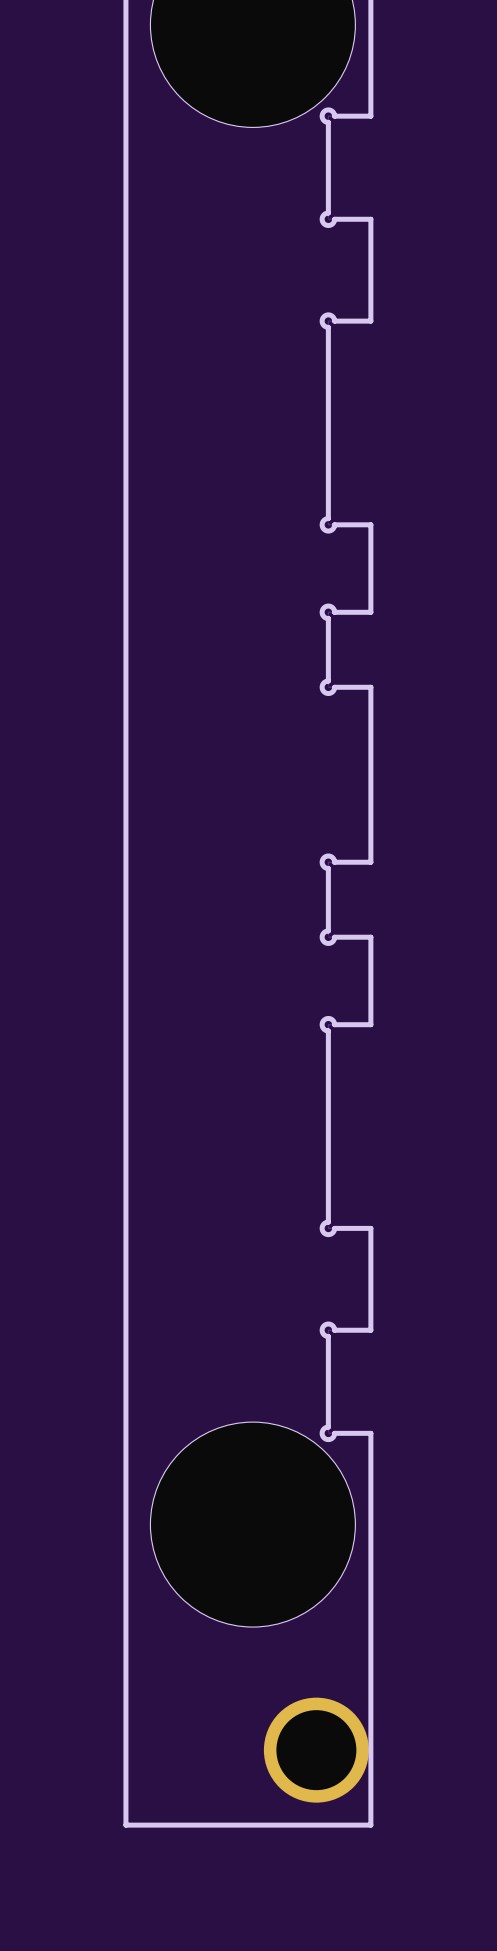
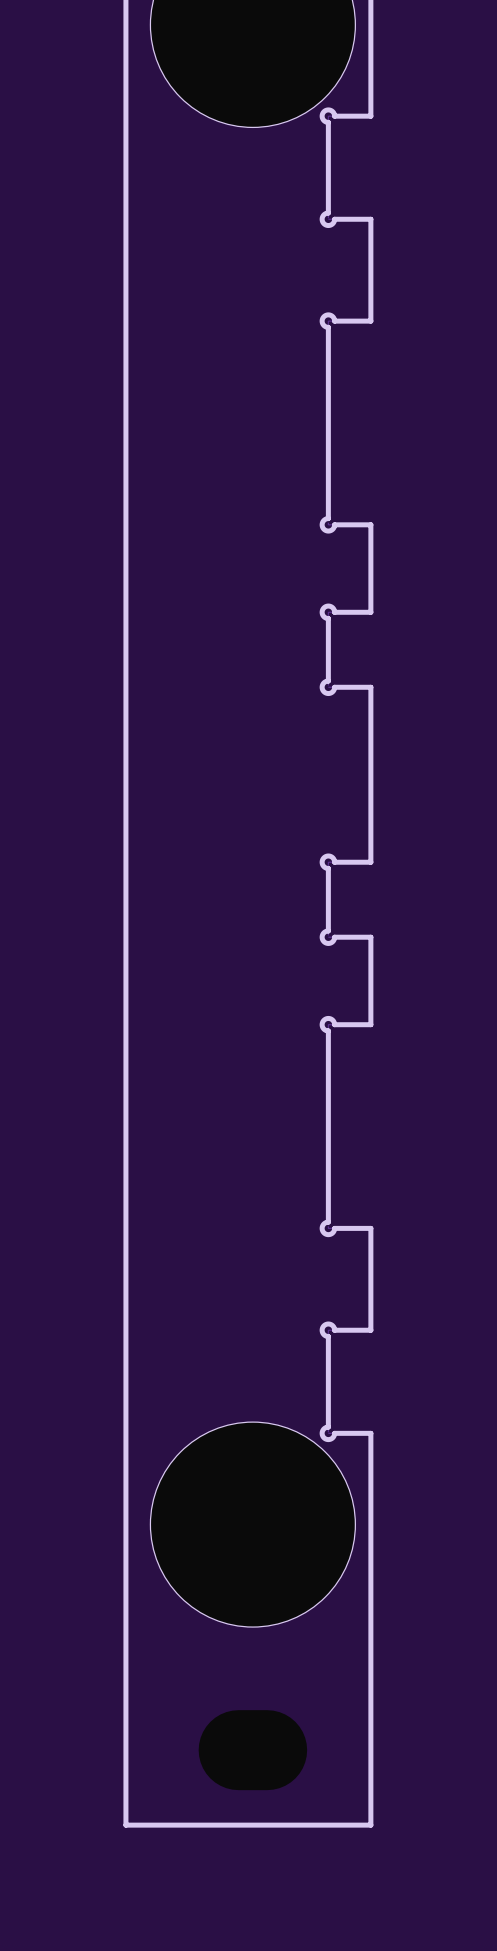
part: none -> (252, 1750)
part: (316, 1750) -> none

